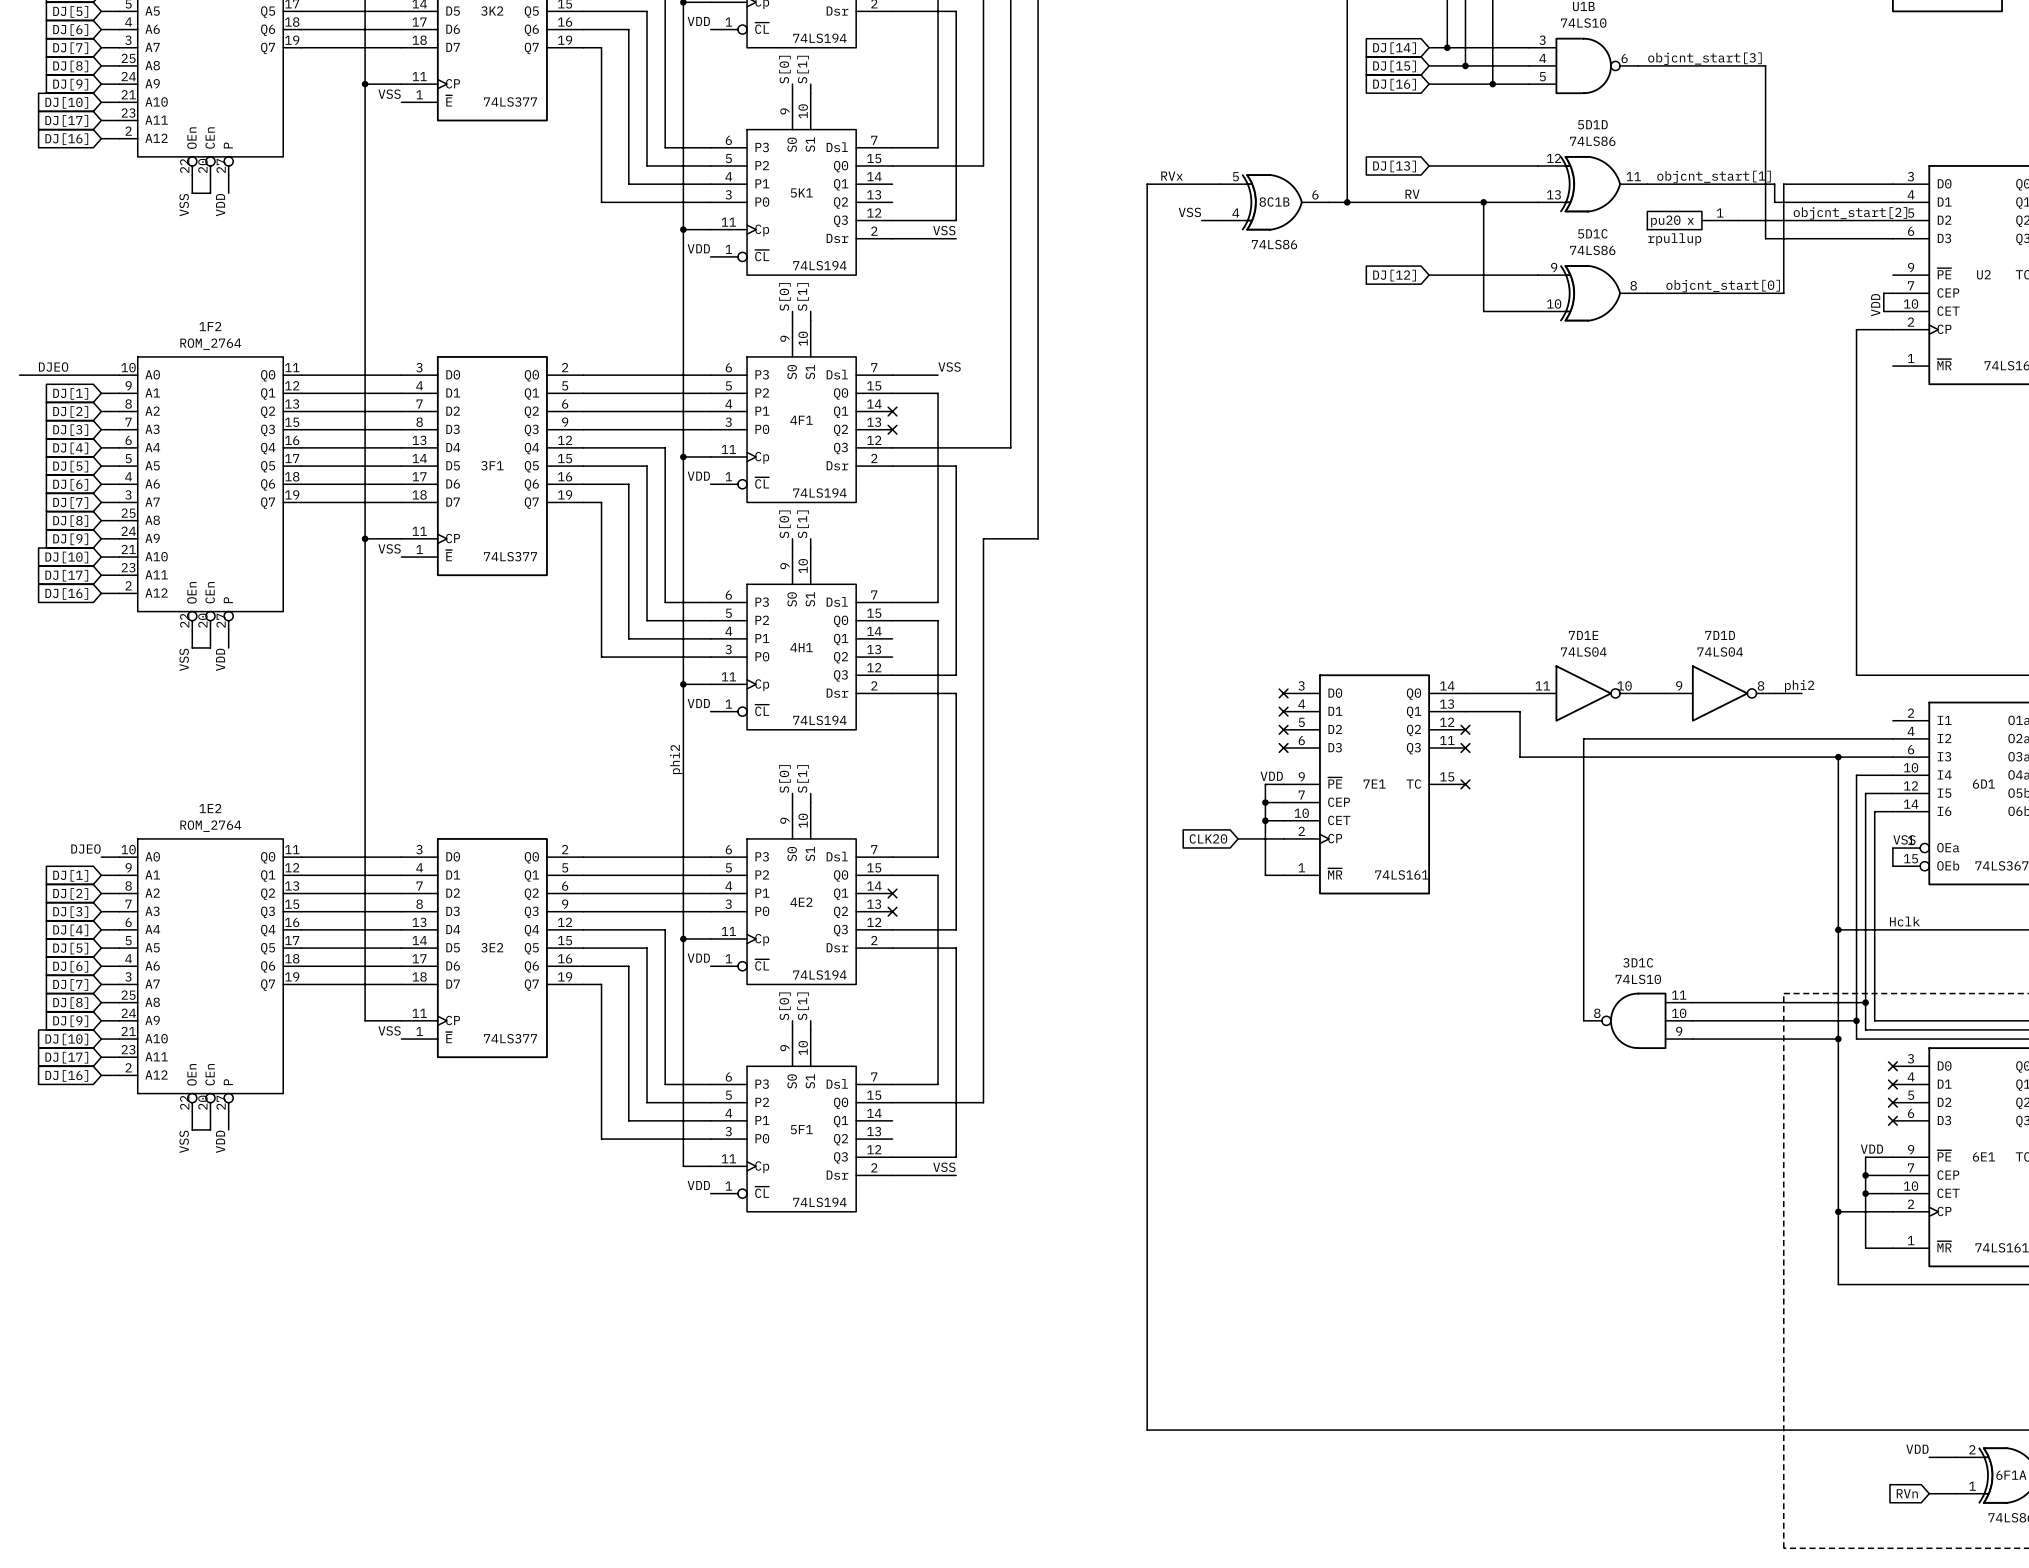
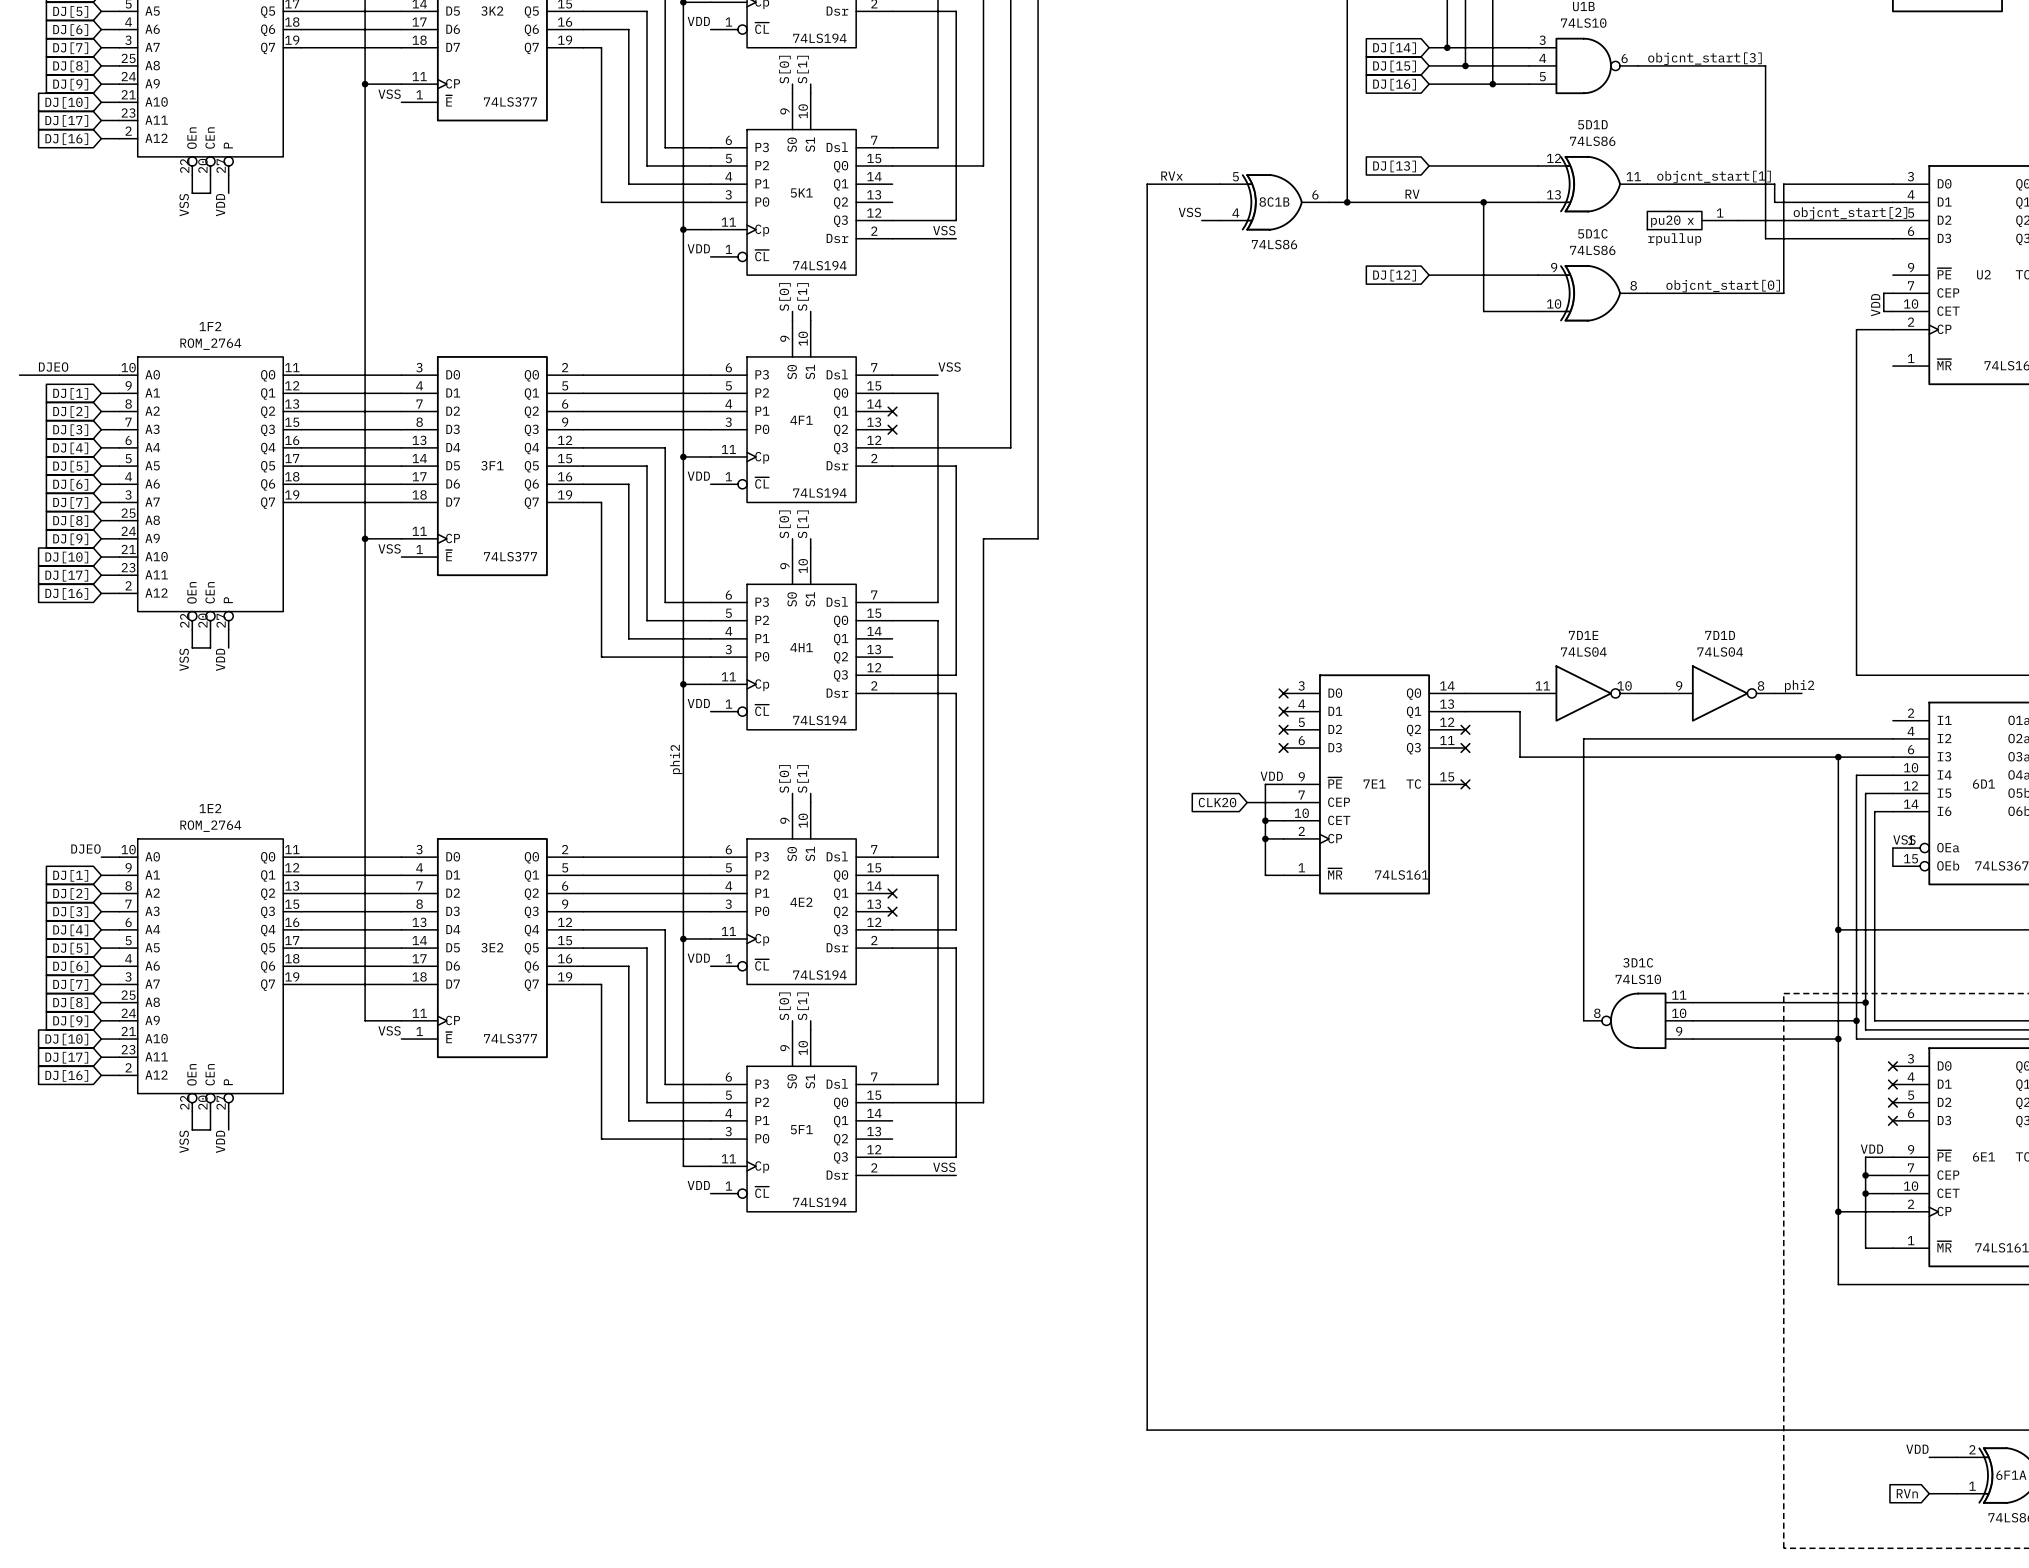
wire: none -> (1247, 802) (1265, 802)
junction position: (1265, 802) -> (1265, 838)
global label position: CLK20 (1208, 838) -> CLK20 (1217, 802)
wire: (1238, 838) (1265, 838) -> none
label: Hclk (1904, 921) -> none

